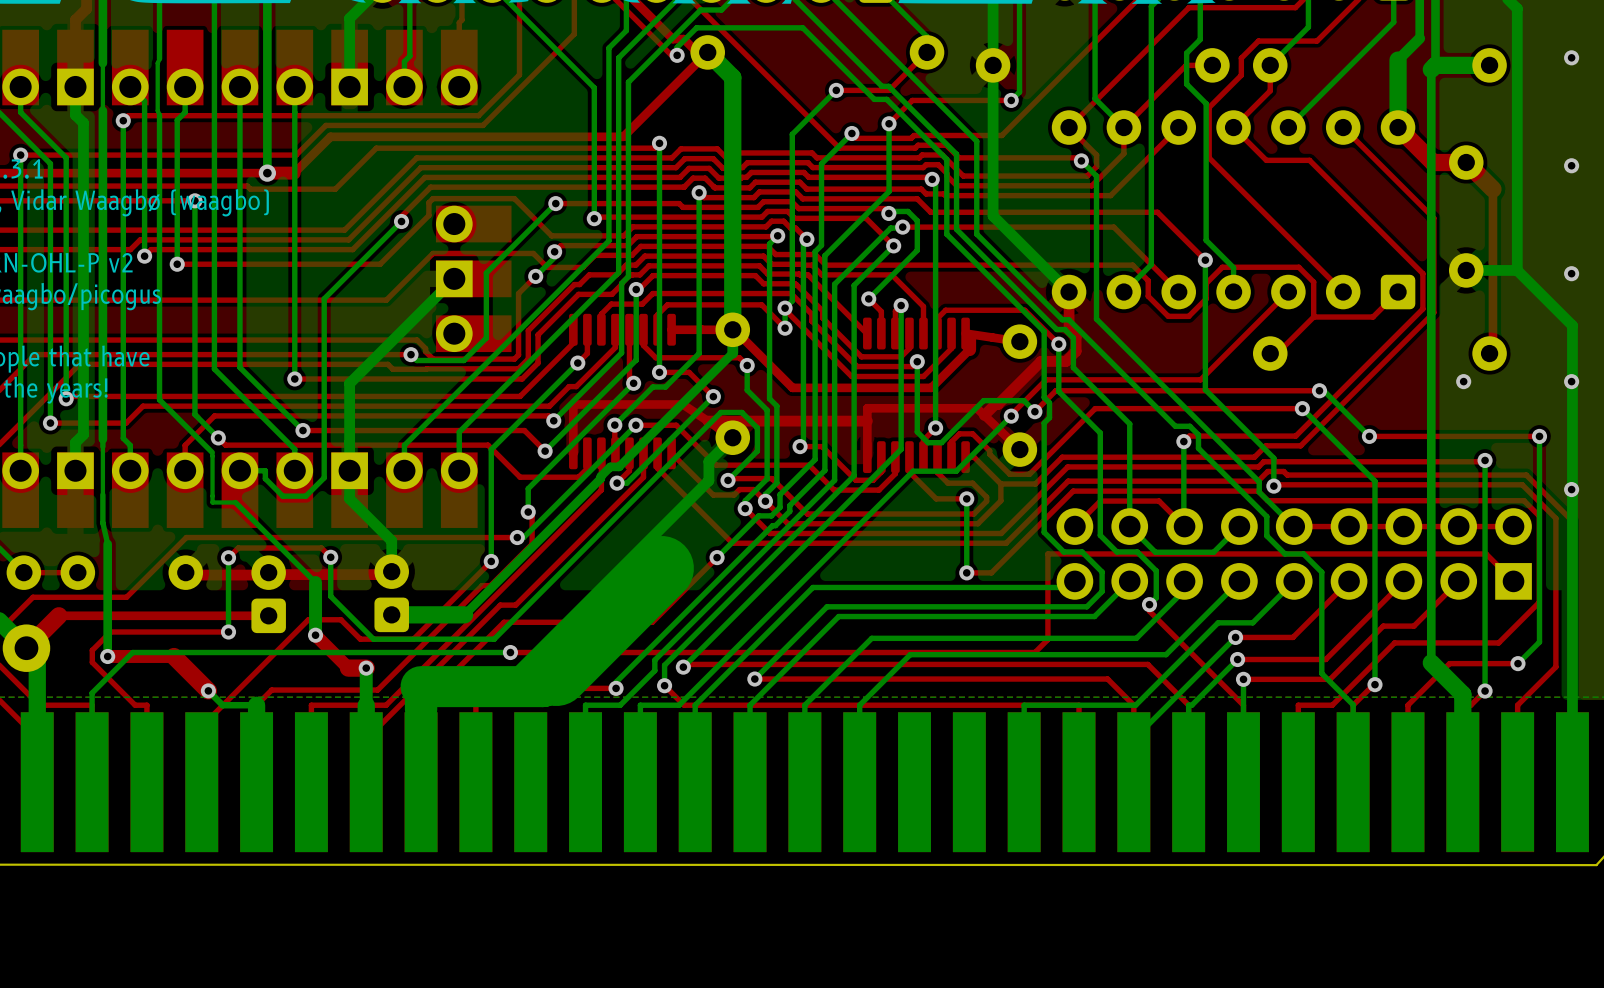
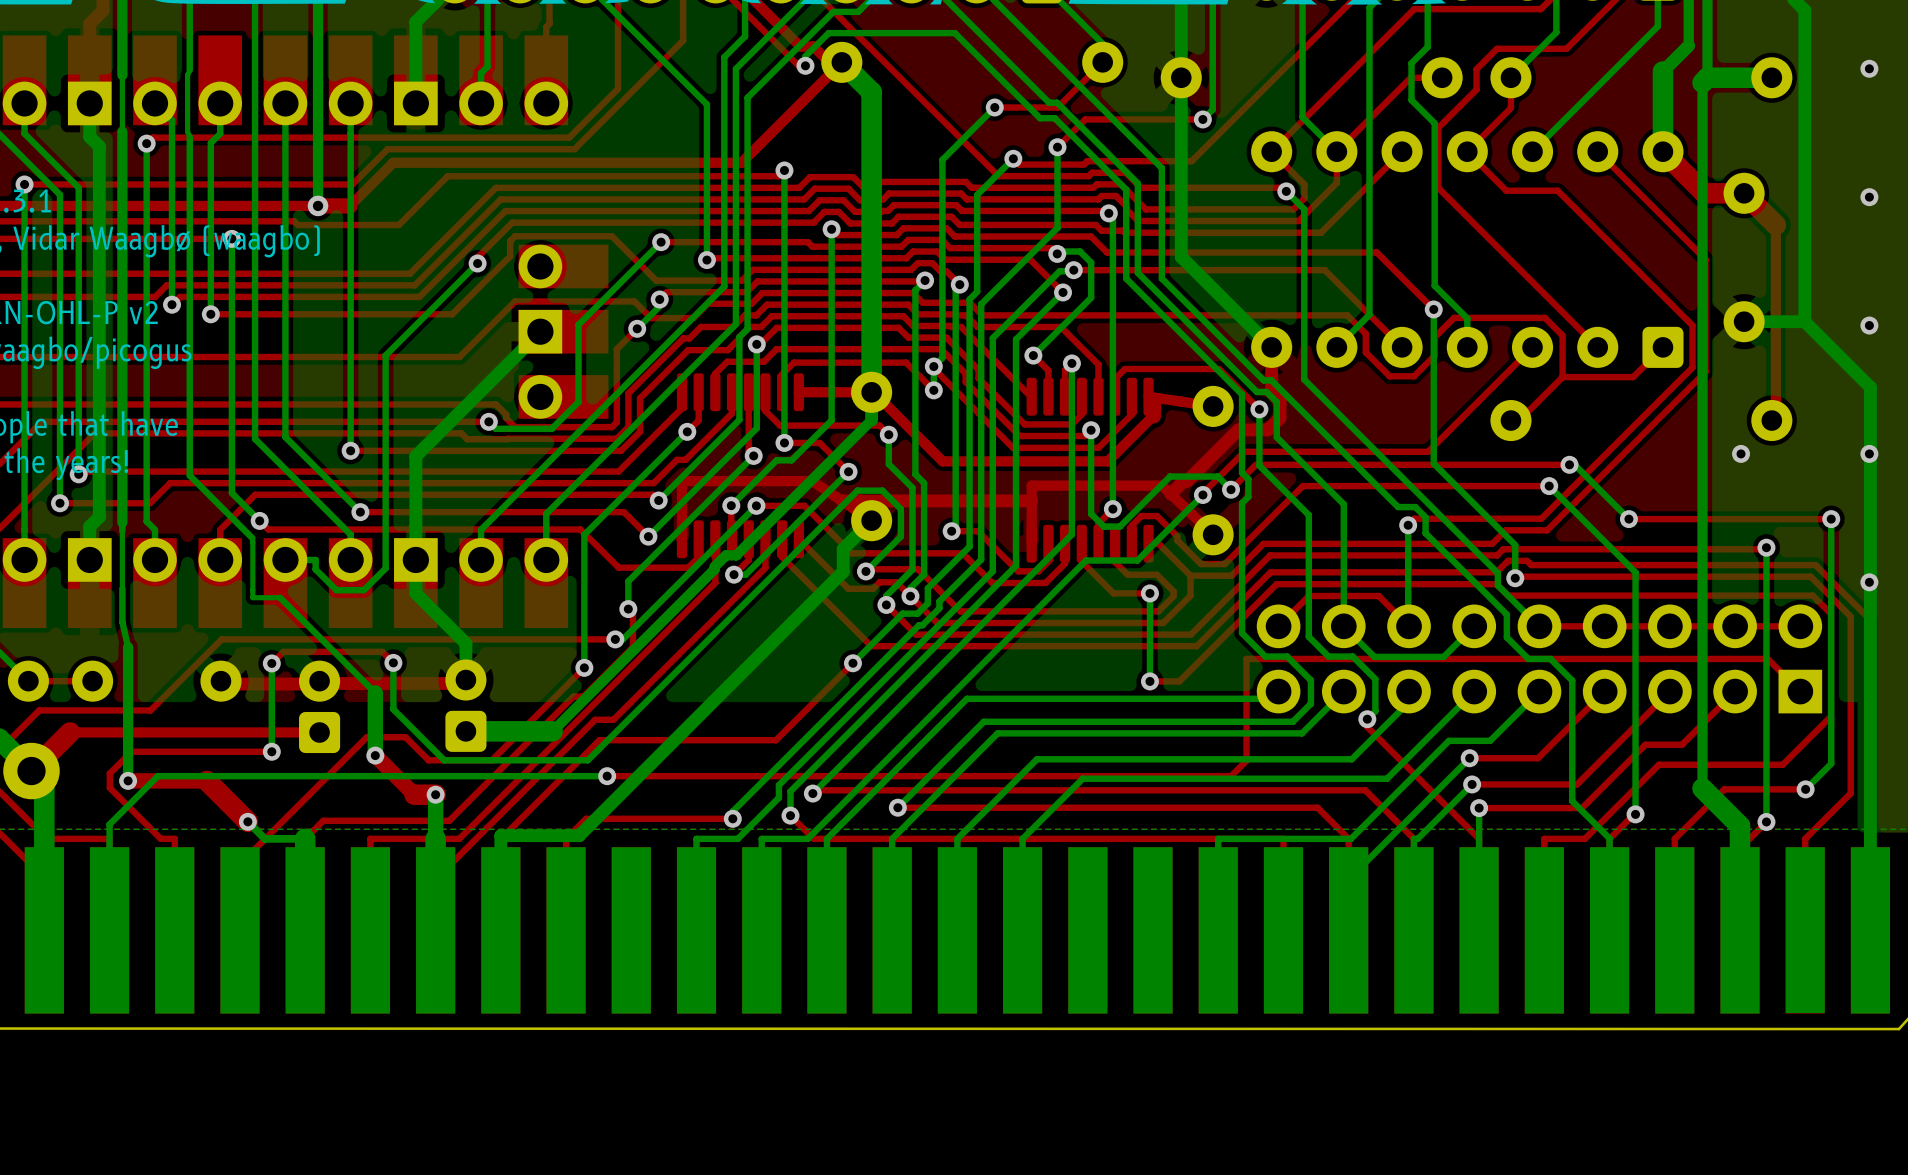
bottom track: (661, 568) (543, 686) (421, 686) (421, 709) -> none
bottom track: none -> (617, 797) (579, 835) (500, 835)

